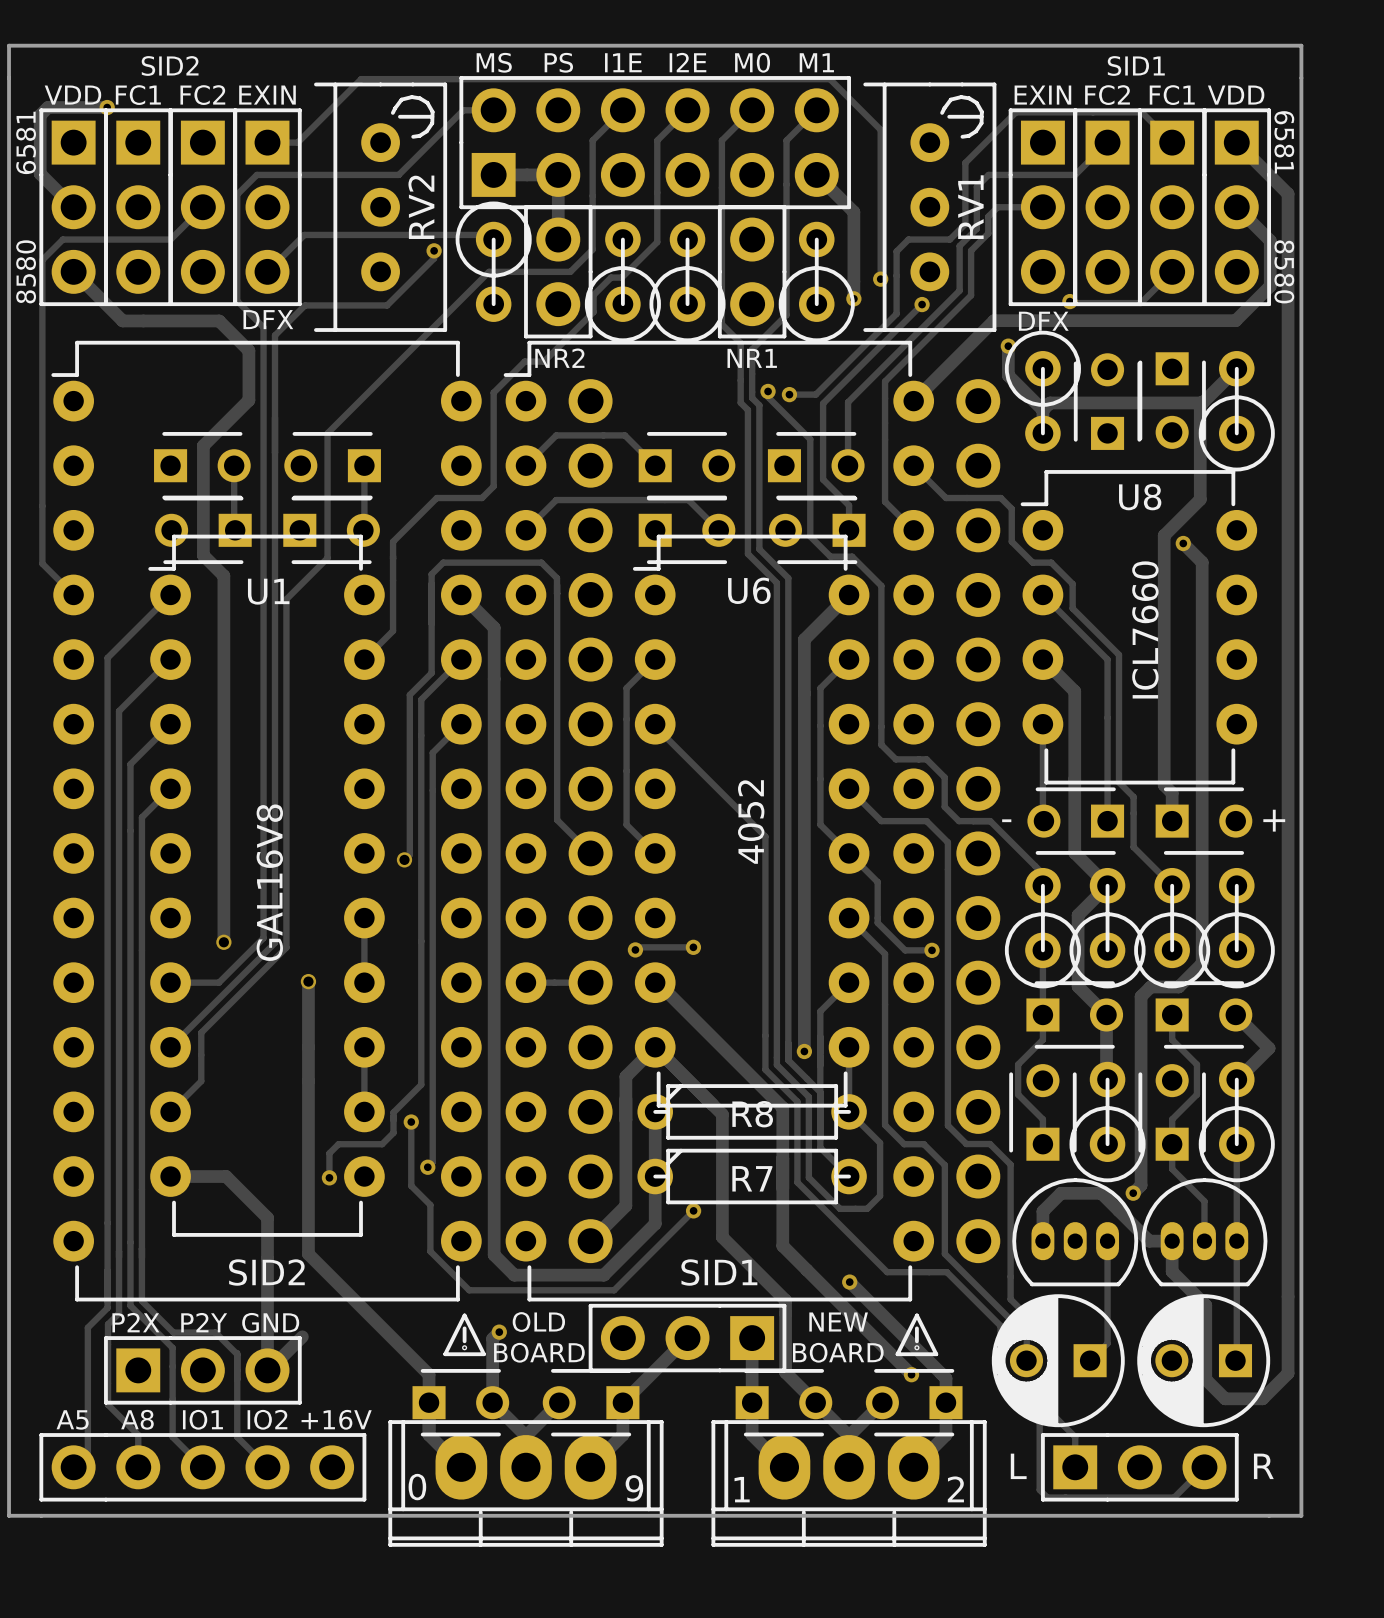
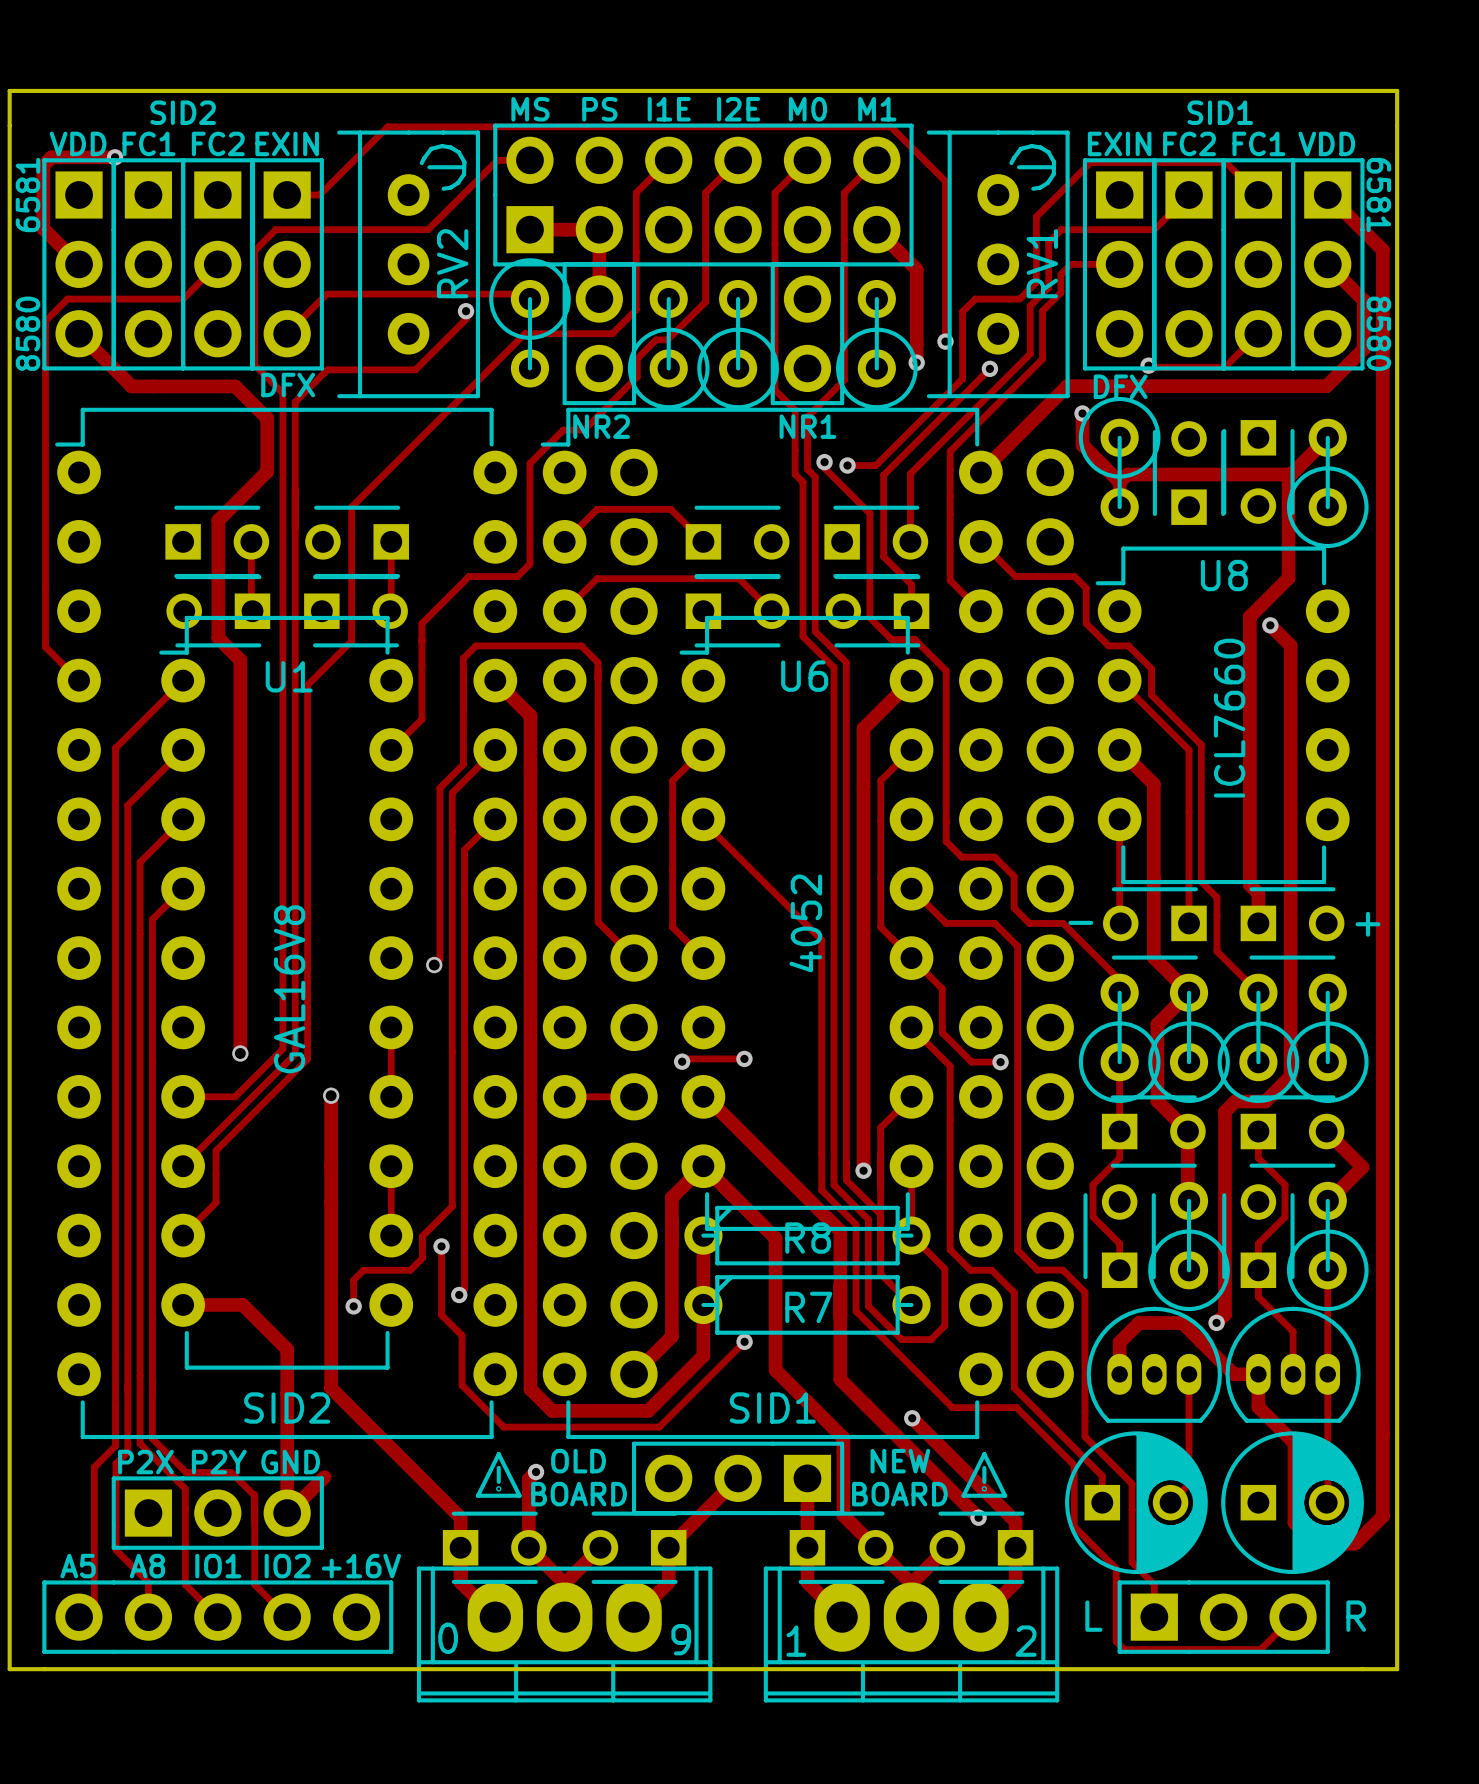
part rotation: 0° (1058, 1360) -> 180° (1136, 1502)
part rotation: 0° (1203, 1360) -> 180° (1292, 1502)

